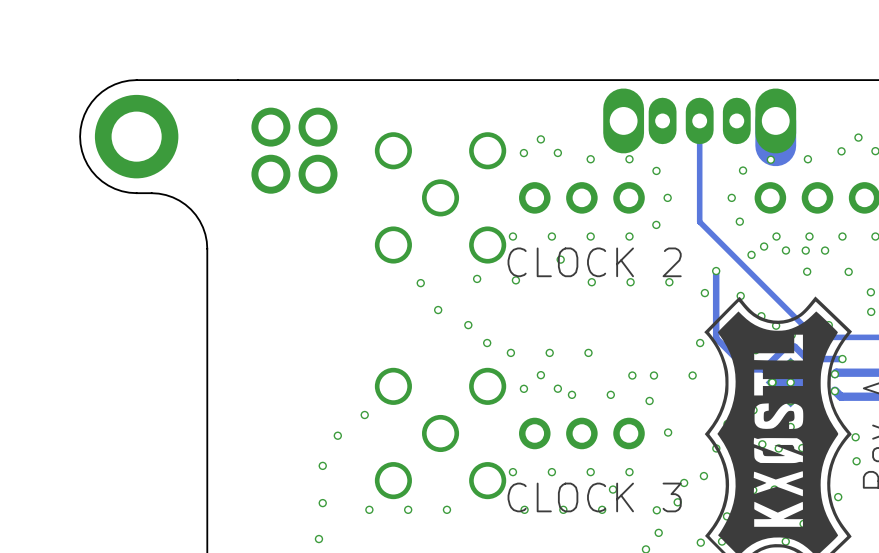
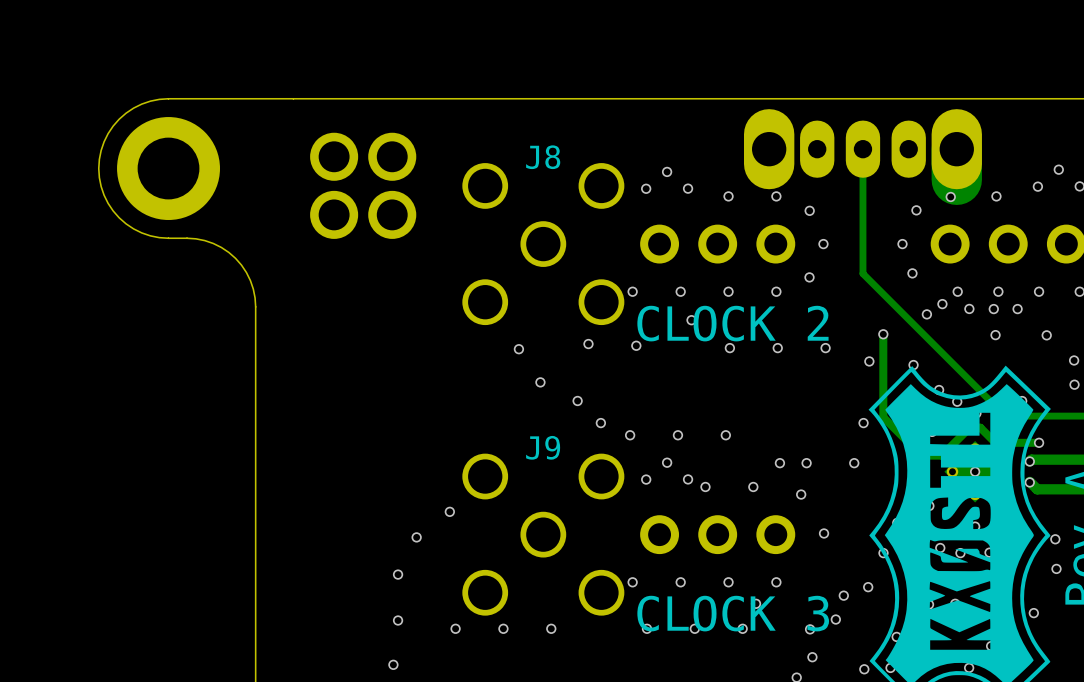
J8 name: none -> J8 (543, 157)
J9 name: none -> J9 (543, 447)

